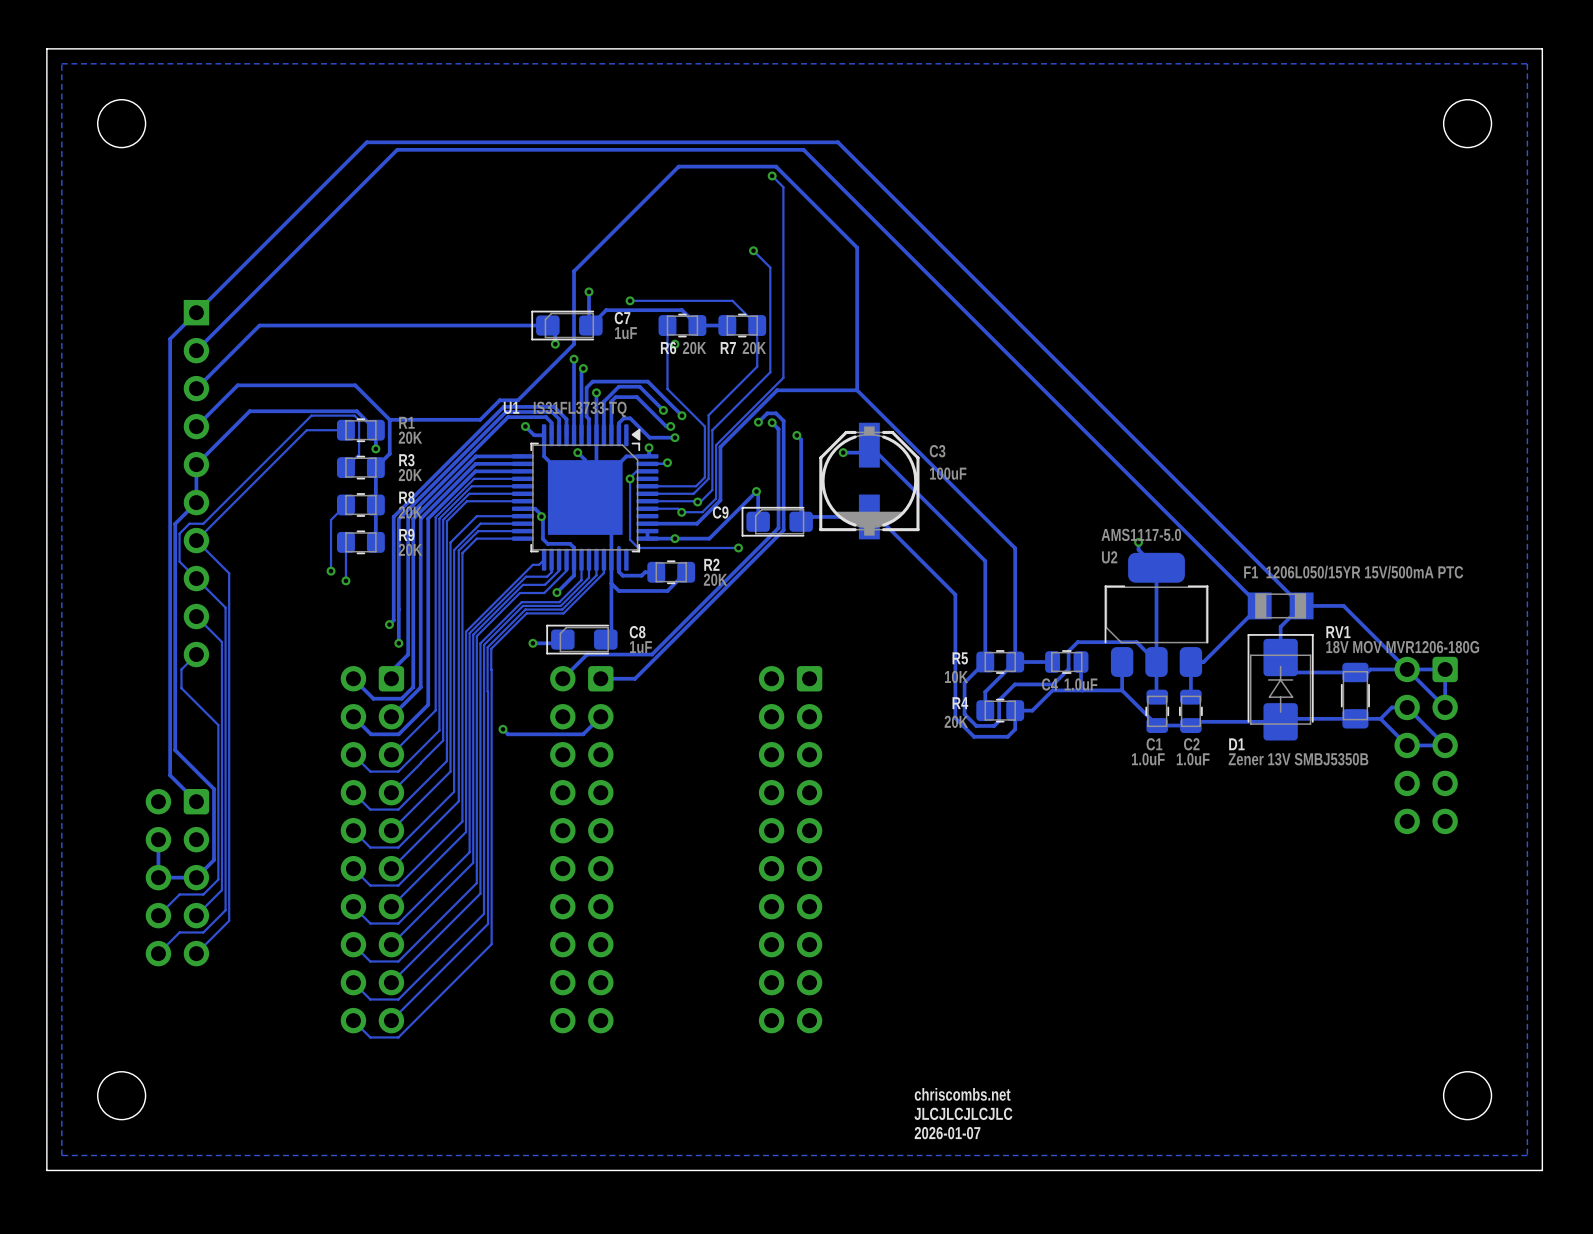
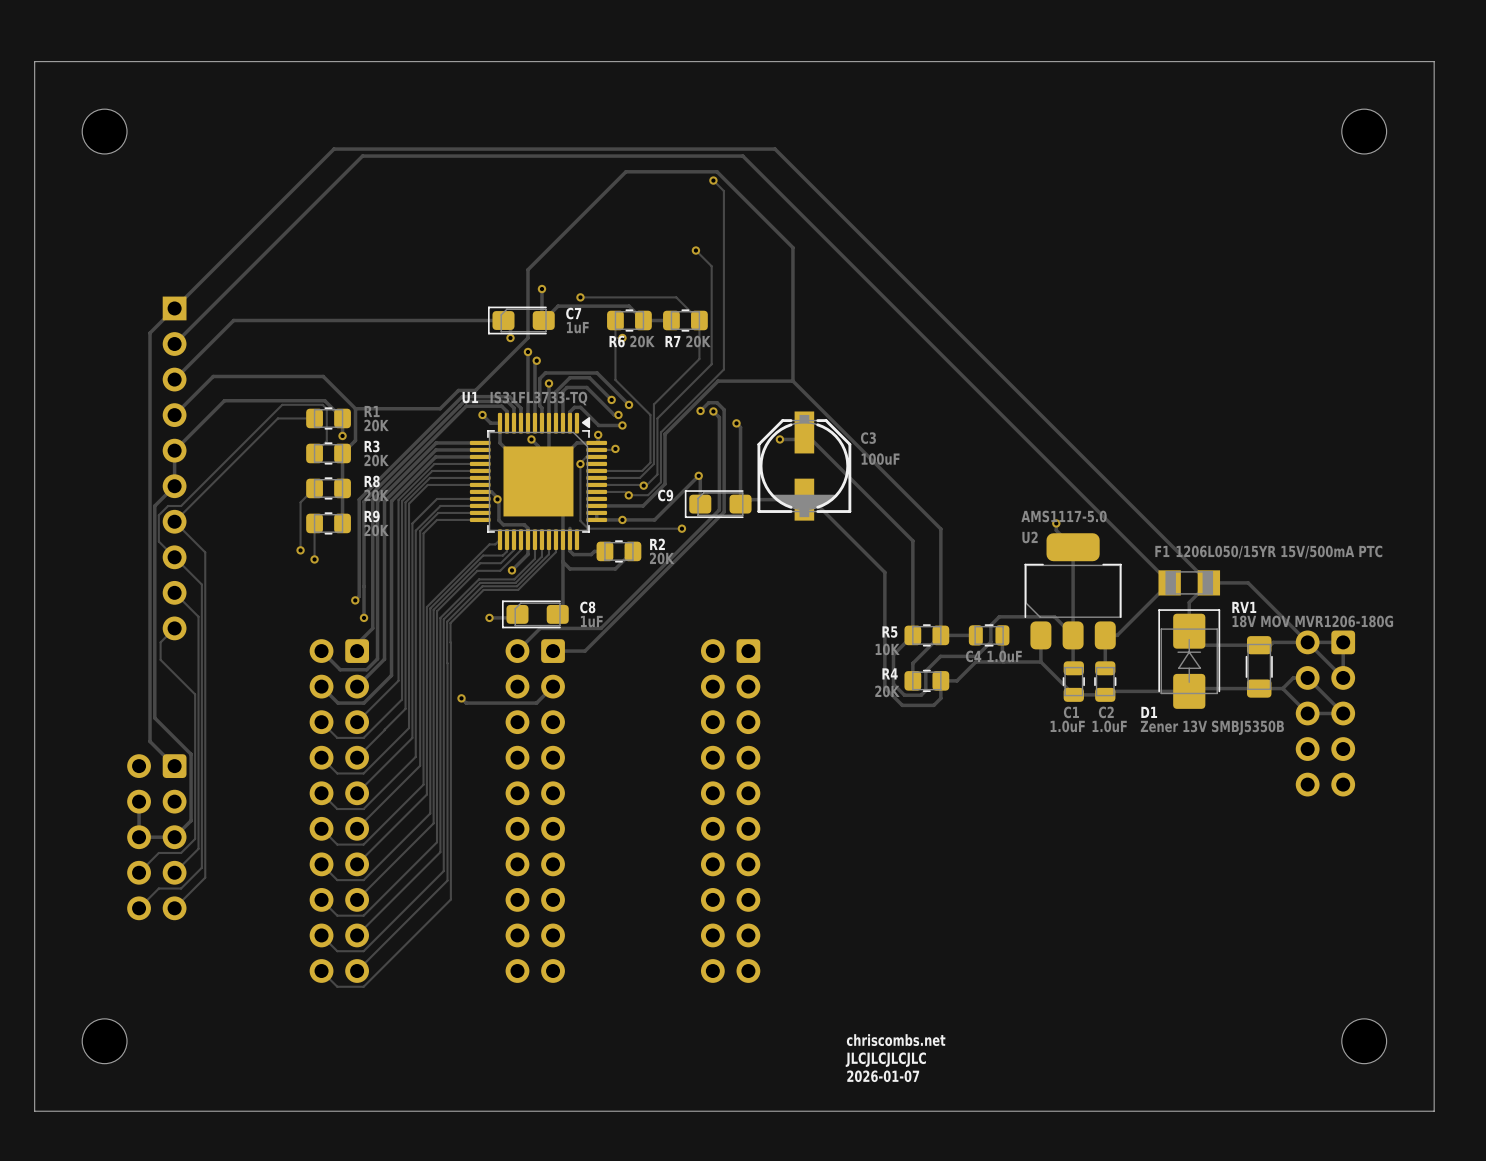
zone outline: (1527, 63) (1527, 1155) (61, 1155) (61, 63) (1527, 63) -> none

